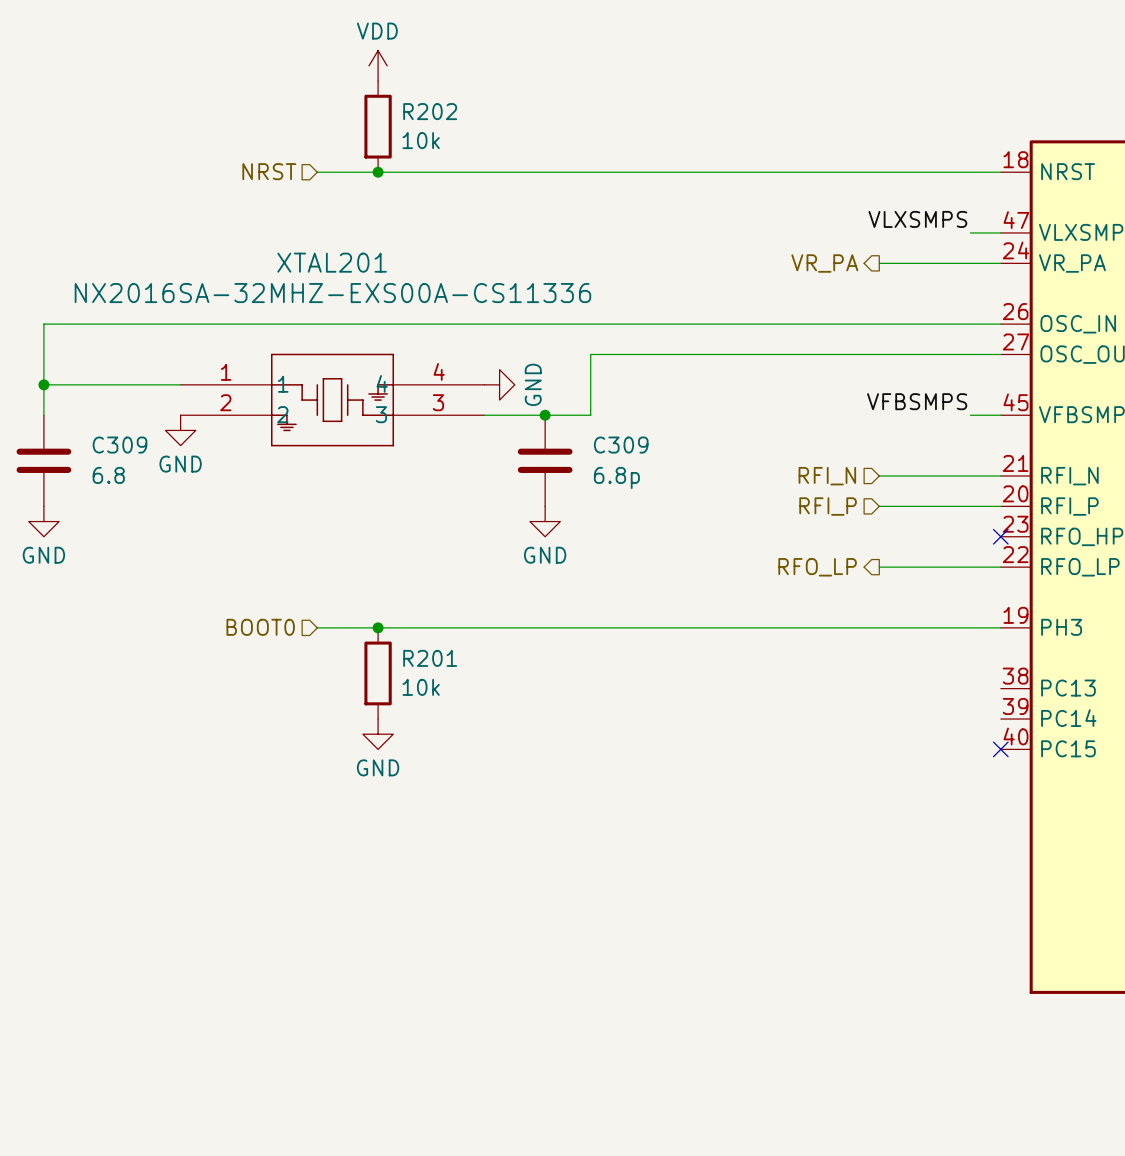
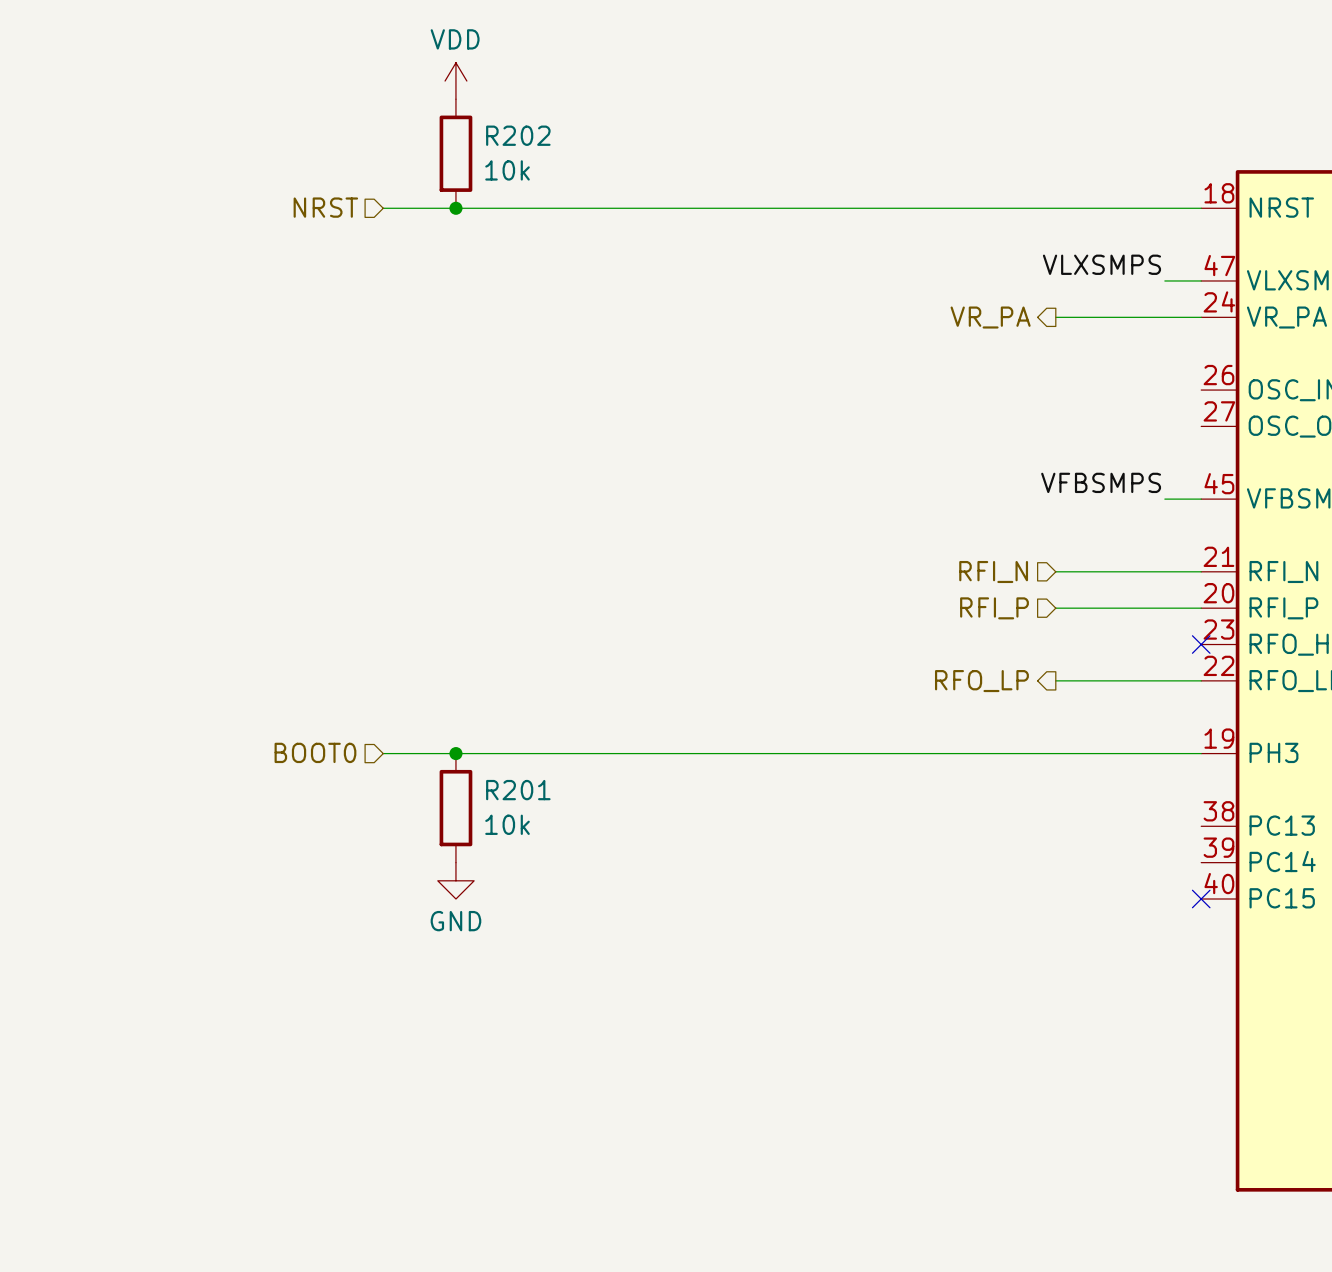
wire: (1000, 324) (43, 324) (43, 415) -> none
wire: (1000, 354) (590, 354) (590, 415) (484, 415) -> none
wire: (43, 384) (180, 384) -> none
junction: (43, 384) -> none
power symbol: GND (499, 384) -> none
XTAL201: NX2016SA-32MHZ-EXS00A-CS11336 (332, 400) -> none
junction: (545, 415) -> none
power symbol: GND (180, 430) -> none
C309: 6.8 (43, 460) -> none
C309: 6.8p (545, 460) -> none
power symbol: GND (43, 521) -> none
power symbol: GND (545, 521) -> none

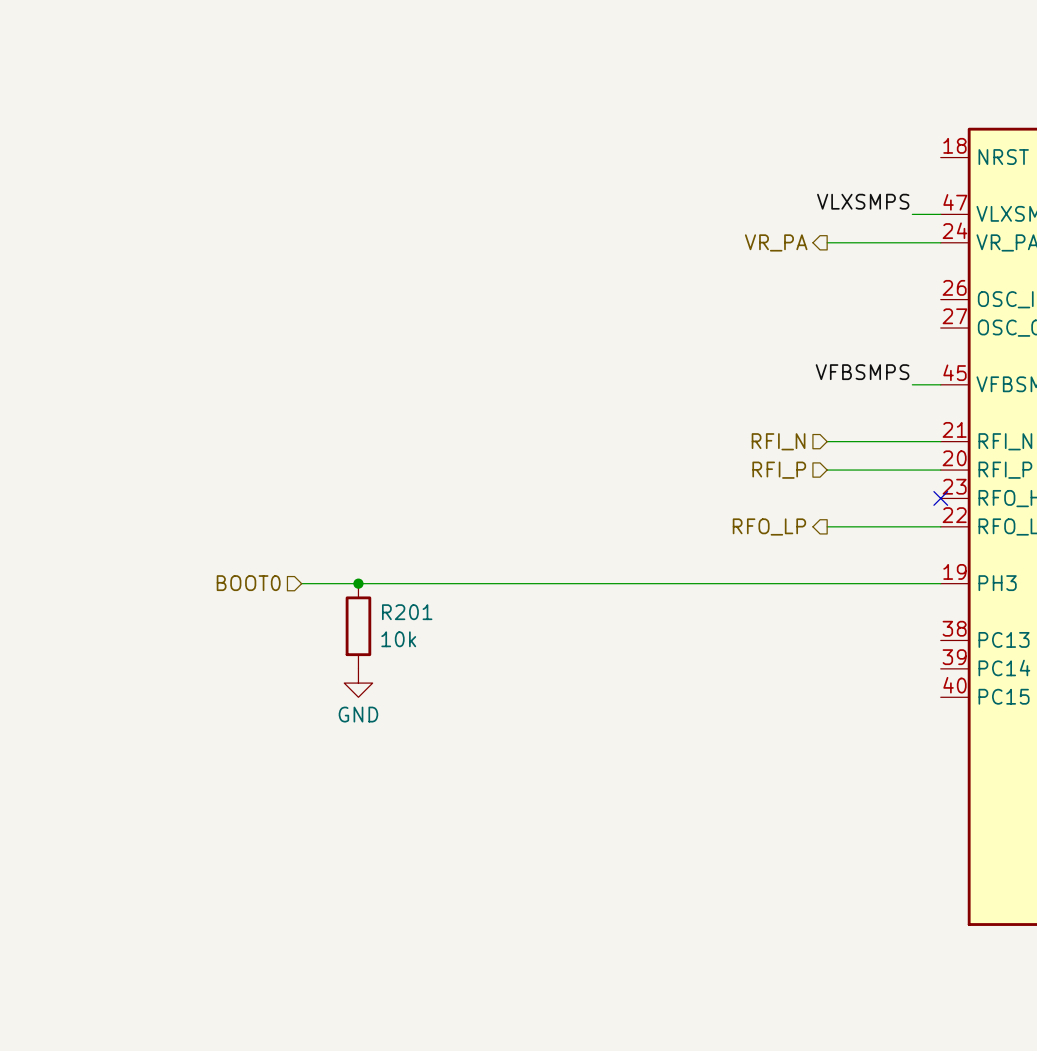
power symbol: VDD (455, 81) -> none
R202: 10k (455, 153) -> none
hierarchical label: NRST (325, 207) -> none
wire: (383, 208) (1201, 208) -> none
junction: (455, 208) -> none
no-connect mark: (1201, 898) -> none

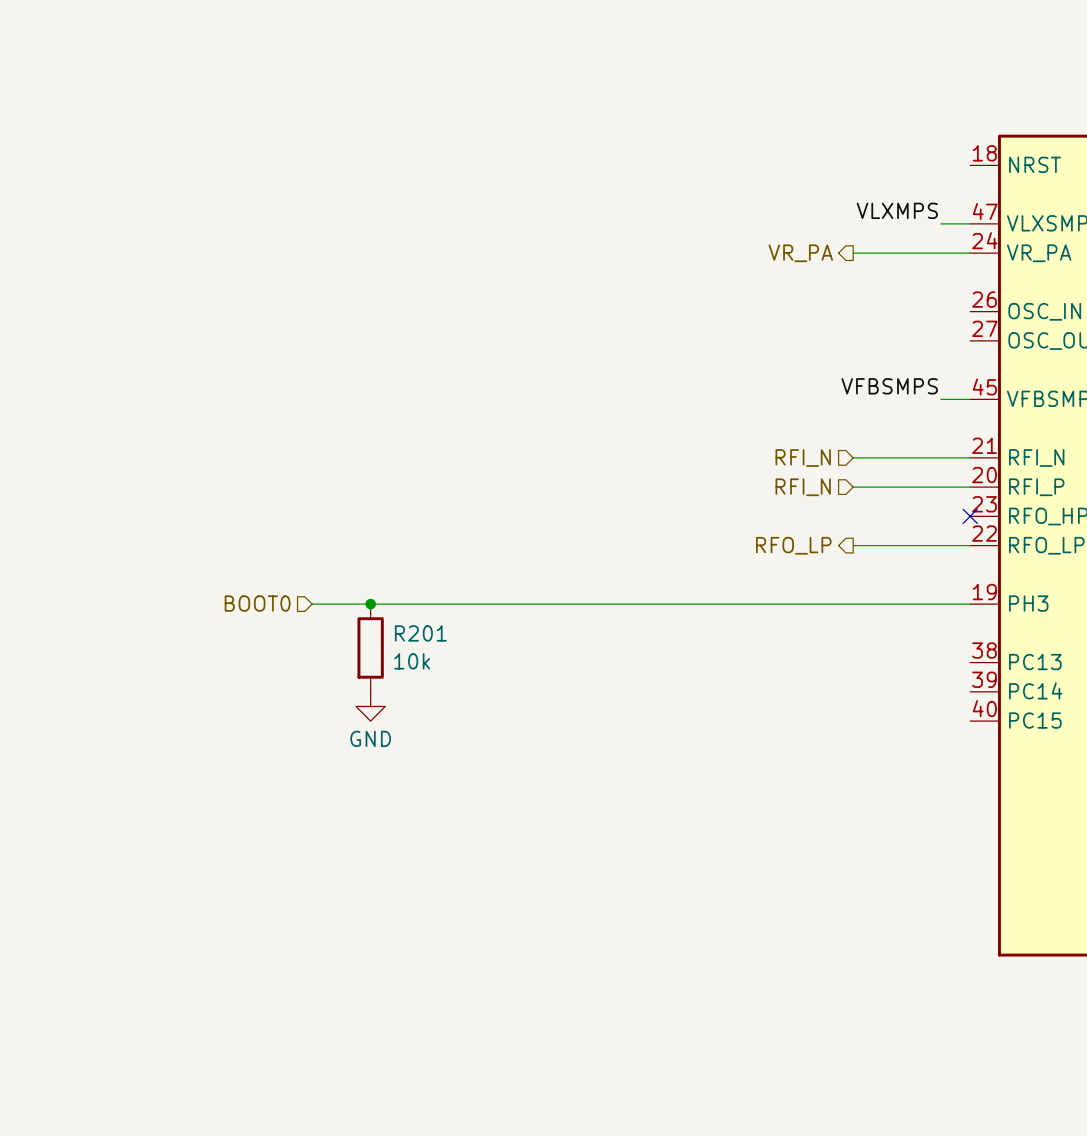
label: VLXSMPS (863, 201) -> VLXMPS (897, 210)
hierarchical label: RFI_P (779, 470) -> RFI_N (803, 487)

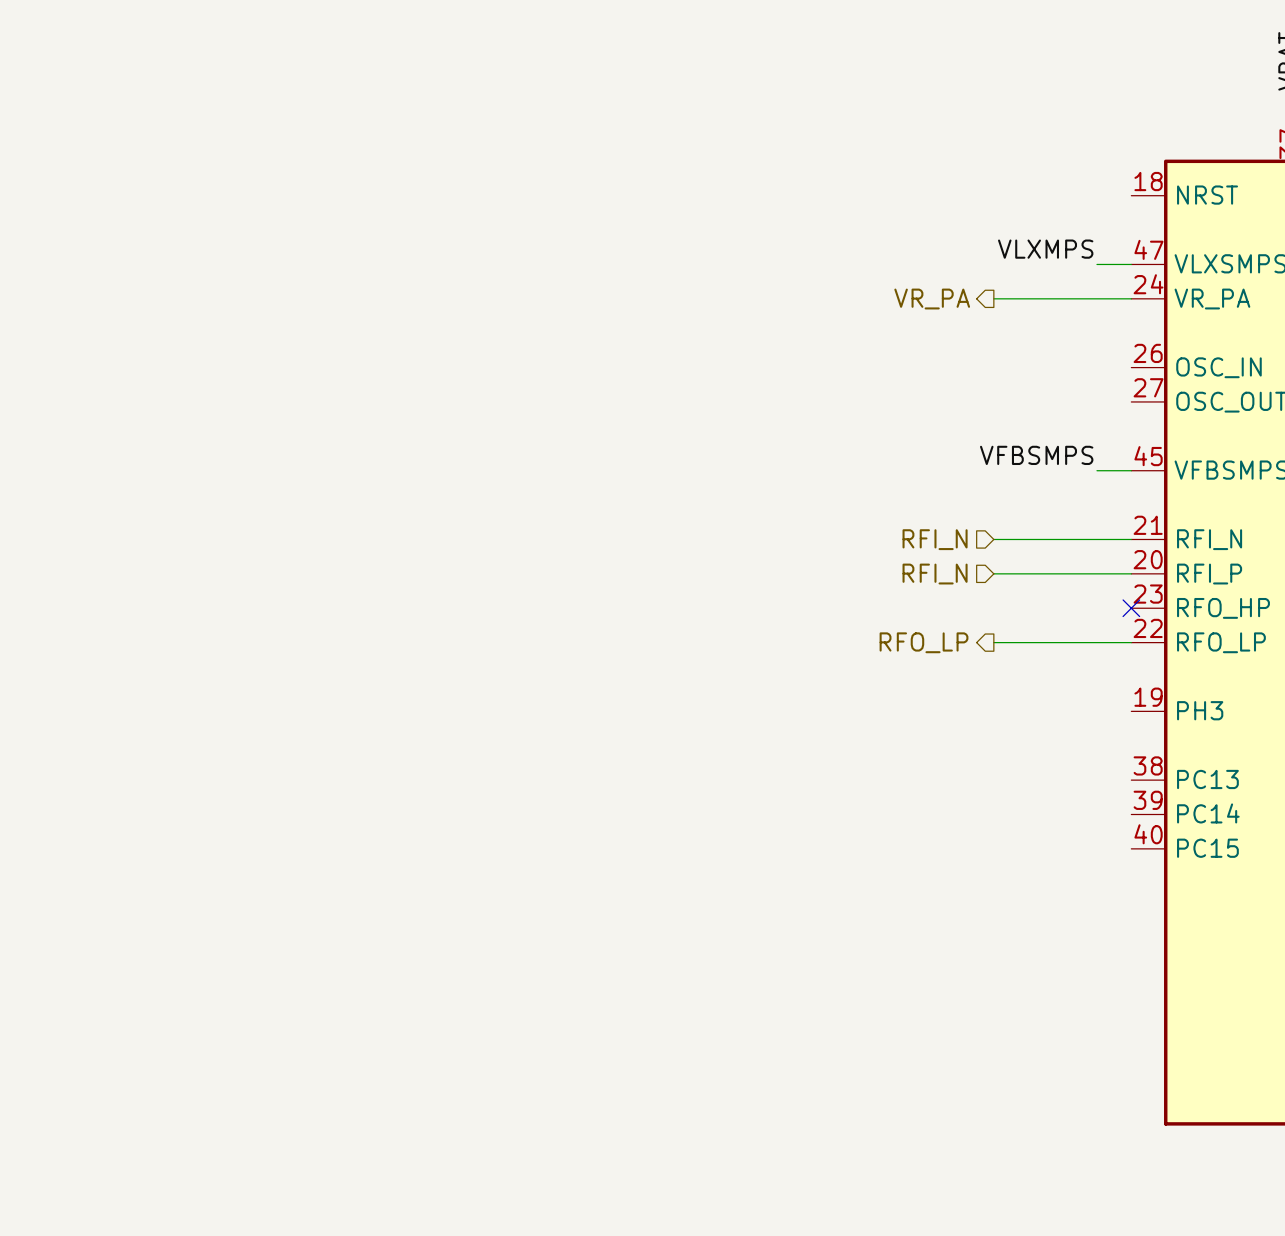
hierarchical label: BOOT0 (257, 603) -> none
wire: (312, 604) (970, 604) -> none
junction: (370, 604) -> none
R201: 10k (370, 647) -> none
power symbol: GND (370, 706) -> none

